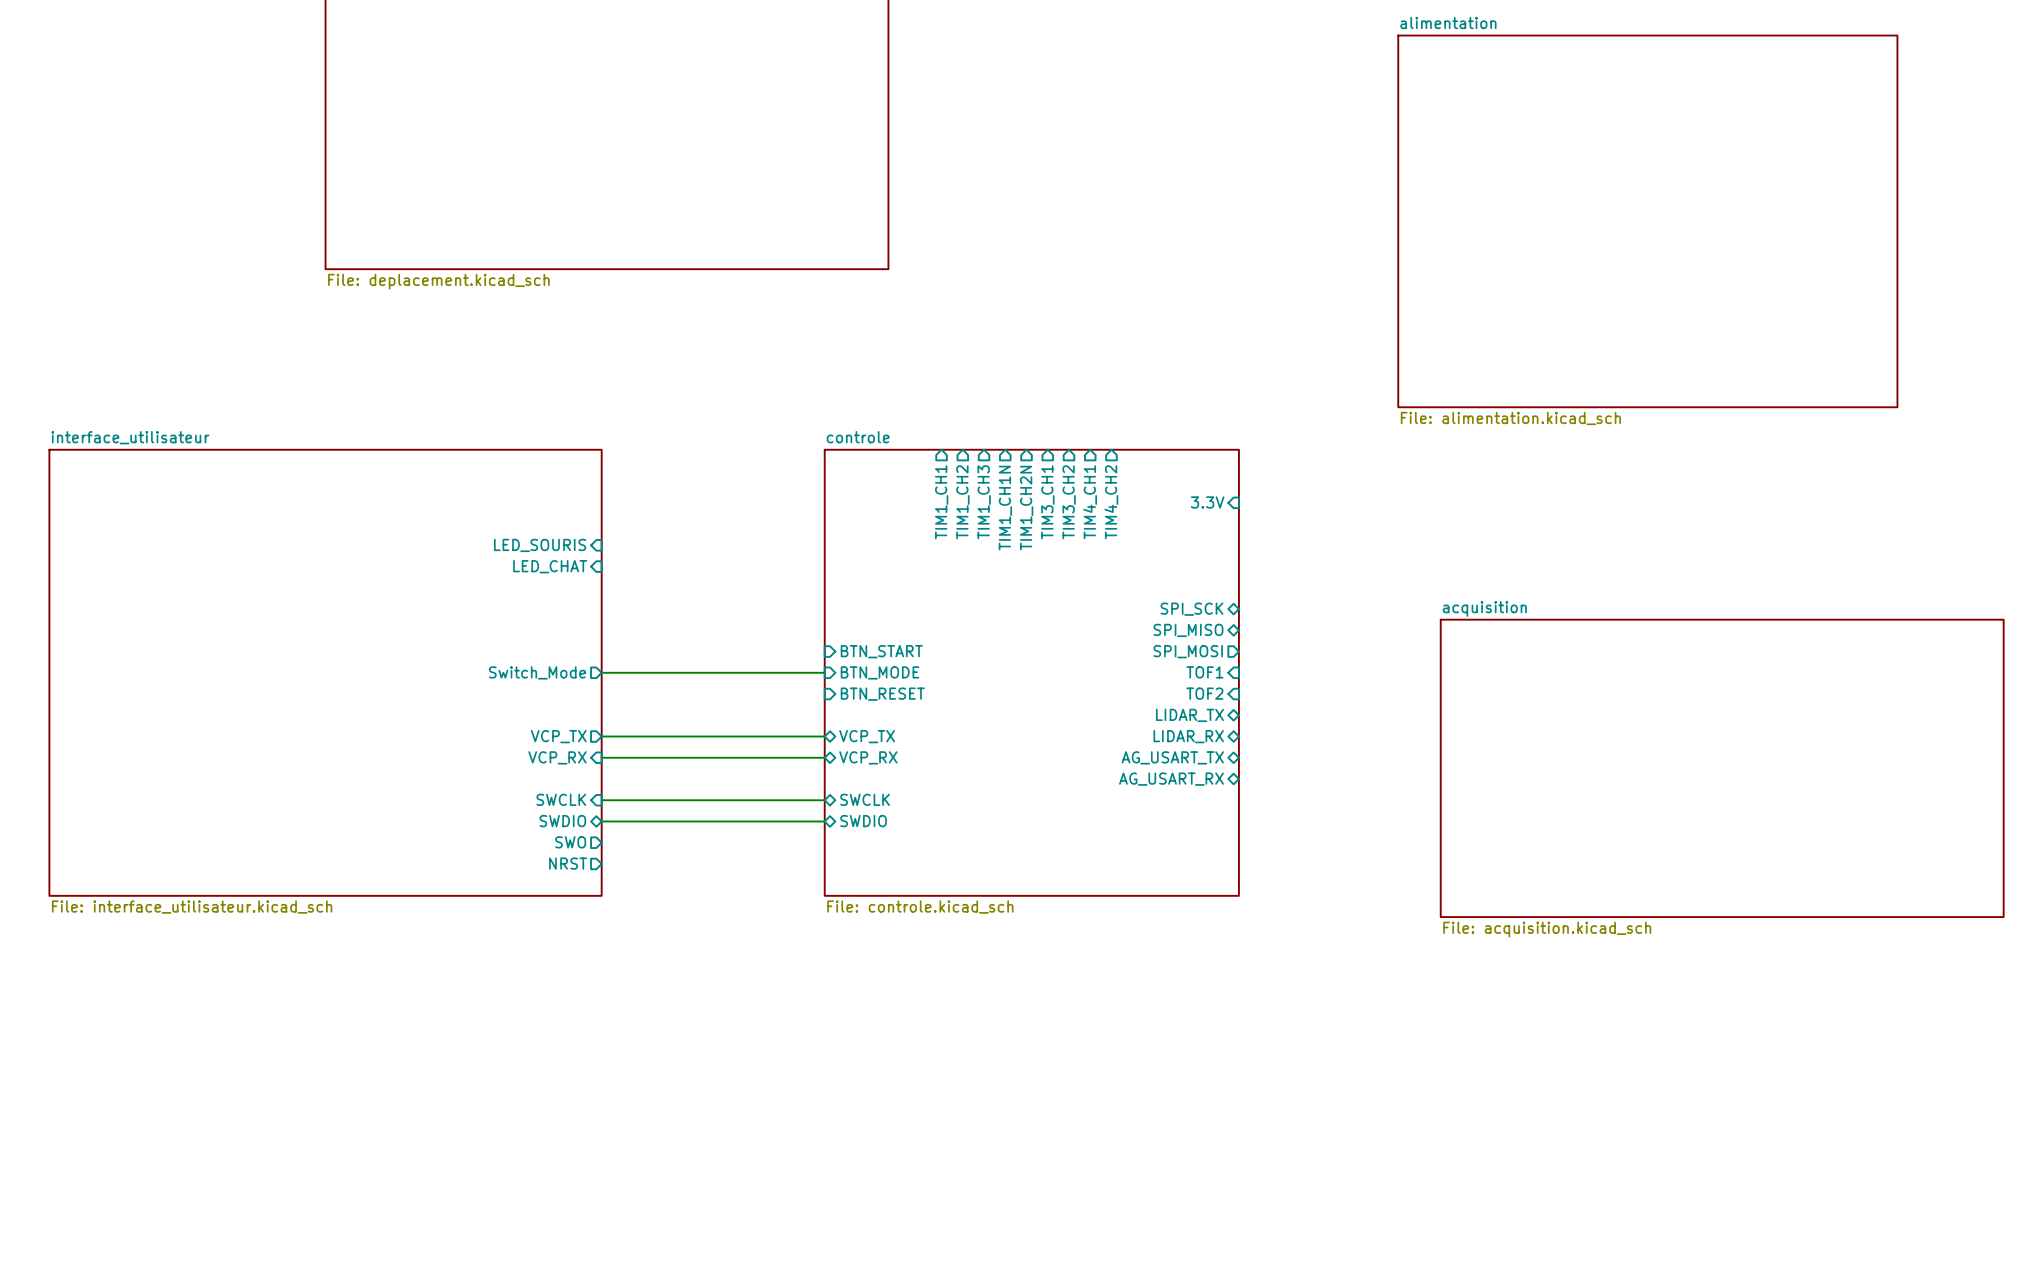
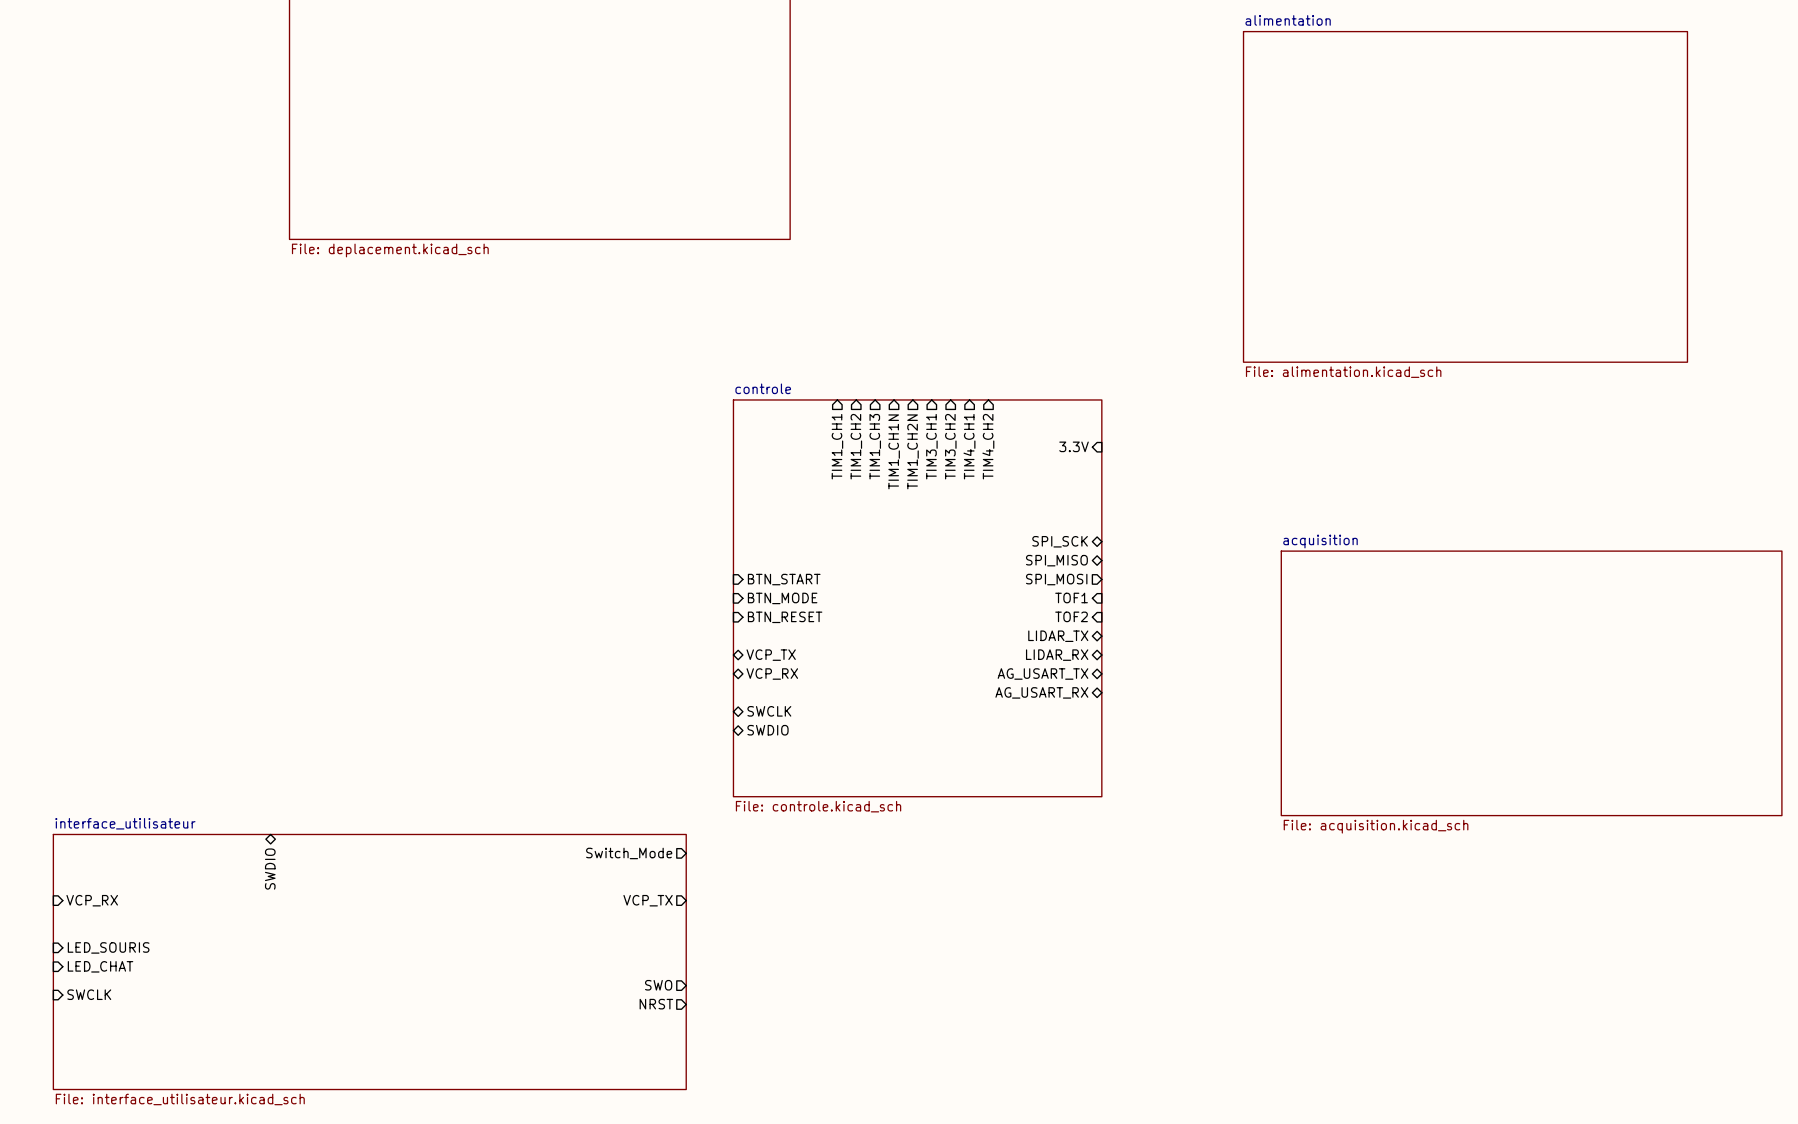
sheet pin: LED_SOURIS (540, 545) -> none
sheet pin: LED_CHAT (550, 566) -> none
sheet interface_utilisateur: File: interface_utilisateur.kicad_sch (325, 672) -> none
sheet pin: Switch_Mode (537, 672) -> none
wire: (601, 672) (824, 672) -> none
sheet pin: VCP_TX (558, 736) -> none
wire: (601, 736) (824, 736) -> none
sheet pin: VCP_RX (557, 757) -> none
wire: (601, 757) (824, 757) -> none
sheet pin: SWCLK (561, 799) -> none
wire: (601, 800) (824, 800) -> none
sheet pin: SWDIO (562, 821) -> none
wire: (601, 821) (824, 821) -> none
sheet pin: SWO (570, 842) -> none
sheet pin: NRST (568, 863) -> none
sheet pin: none -> Switch_Mode (629, 853)
sheet pin: none -> SWDIO (270, 869)
sheet pin: none -> VCP_RX (92, 900)
sheet pin: none -> VCP_TX (648, 900)
sheet pin: none -> LED_SOURIS (108, 947)
sheet interface_utilisateur: none -> File: interface_utilisateur.kicad_sch (369, 961)
sheet pin: none -> LED_CHAT (100, 966)
sheet pin: none -> SWO (658, 985)
sheet pin: none -> SWCLK (89, 994)
sheet pin: none -> NRST (656, 1004)

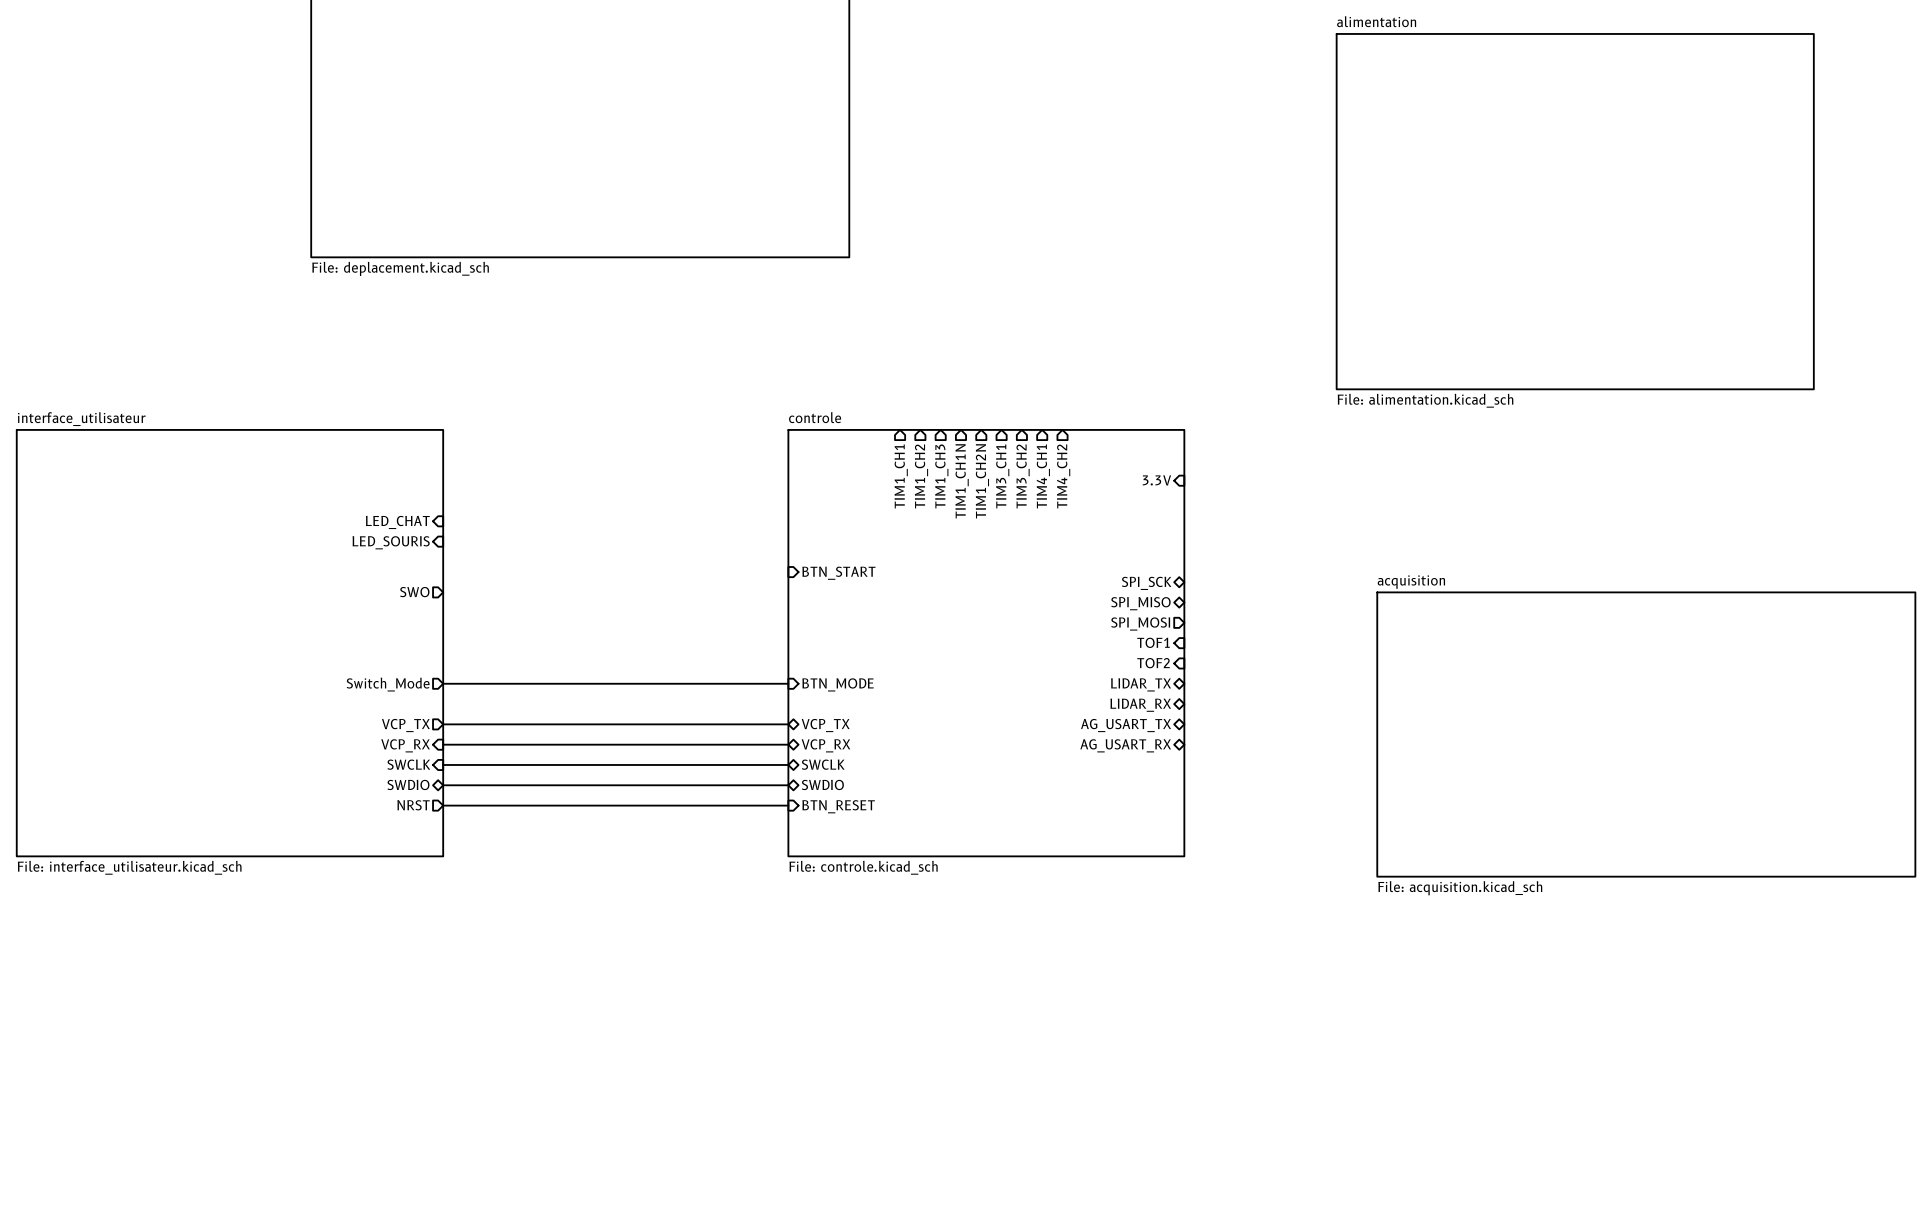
sheet pin: none -> LED_CHAT (397, 522)
sheet pin: none -> LED_SOURIS (391, 542)
sheet pin: none -> SWO (414, 592)
sheet pin position: BTN_START (784, 579) -> BTN_START (838, 573)
sheet interface_utilisateur: none -> File: interface_utilisateur.kicad_sch (229, 643)
sheet pin position: BTN_MODE (782, 598) -> BTN_MODE (838, 684)
sheet pin position: BTN_RESET (785, 617) -> BTN_RESET (838, 806)
sheet pin: none -> Switch_Mode (388, 684)
wire: none -> (443, 683) (788, 683)
sheet pin: VCP_TX (771, 655) -> none
wire: none -> (443, 724) (788, 724)
sheet pin: none -> VCP_TX (405, 725)
sheet pin: VCP_RX (772, 674) -> VCP_TX (825, 725)
sheet pin: none -> VCP_RX (405, 745)
wire: none -> (443, 744) (788, 744)
sheet pin: none -> VCP_RX (825, 745)
sheet pin: none -> SWCLK (408, 764)
wire: none -> (443, 764) (788, 764)
wire: none -> (443, 785) (788, 785)
sheet pin: none -> NRST (413, 805)
wire: none -> (443, 805) (788, 805)
sheet pin: Switch_Mode (629, 853) -> none
sheet pin rotation: 0° (270, 869) -> 90° clockwise (408, 784)
sheet pin position: SWDIO (270, 869) -> SWDIO (408, 784)
sheet pin: VCP_RX (92, 900) -> none
sheet pin: VCP_TX (648, 900) -> none
sheet pin: LED_SOURIS (108, 947) -> none
sheet interface_utilisateur: File: interface_utilisateur.kicad_sch (369, 961) -> none
sheet pin: LED_CHAT (100, 966) -> none
sheet pin: SWO (658, 985) -> none
sheet pin: SWCLK (89, 994) -> none
sheet pin: NRST (656, 1004) -> none

